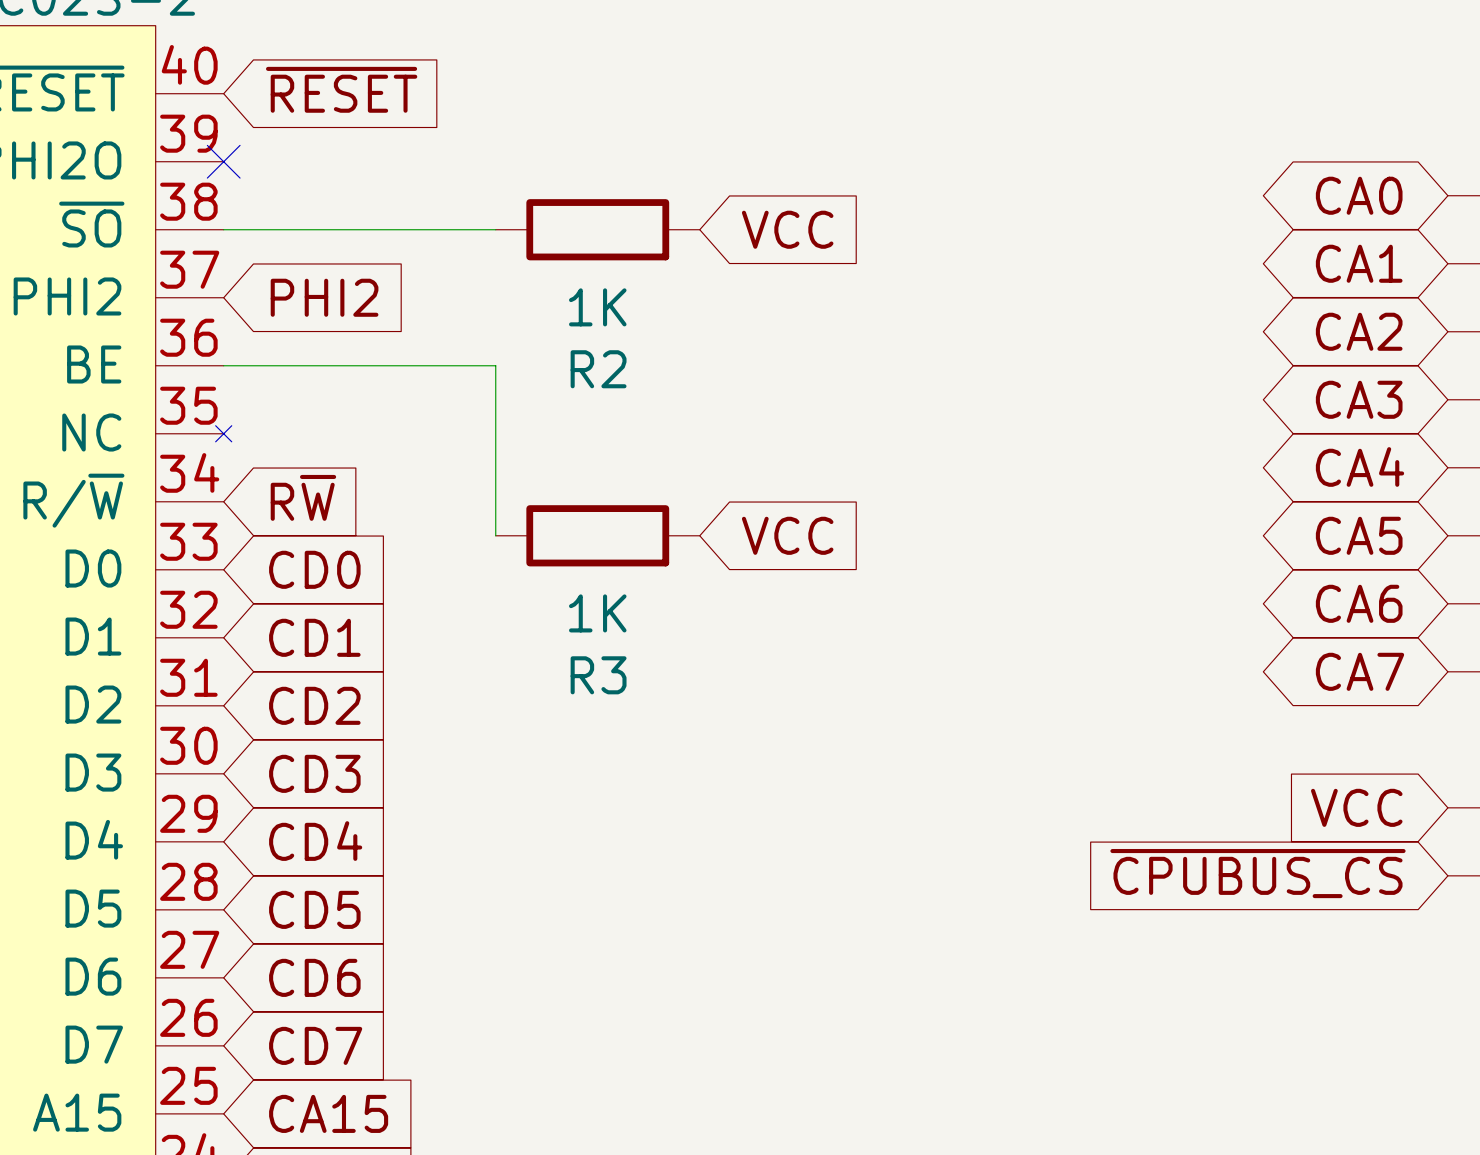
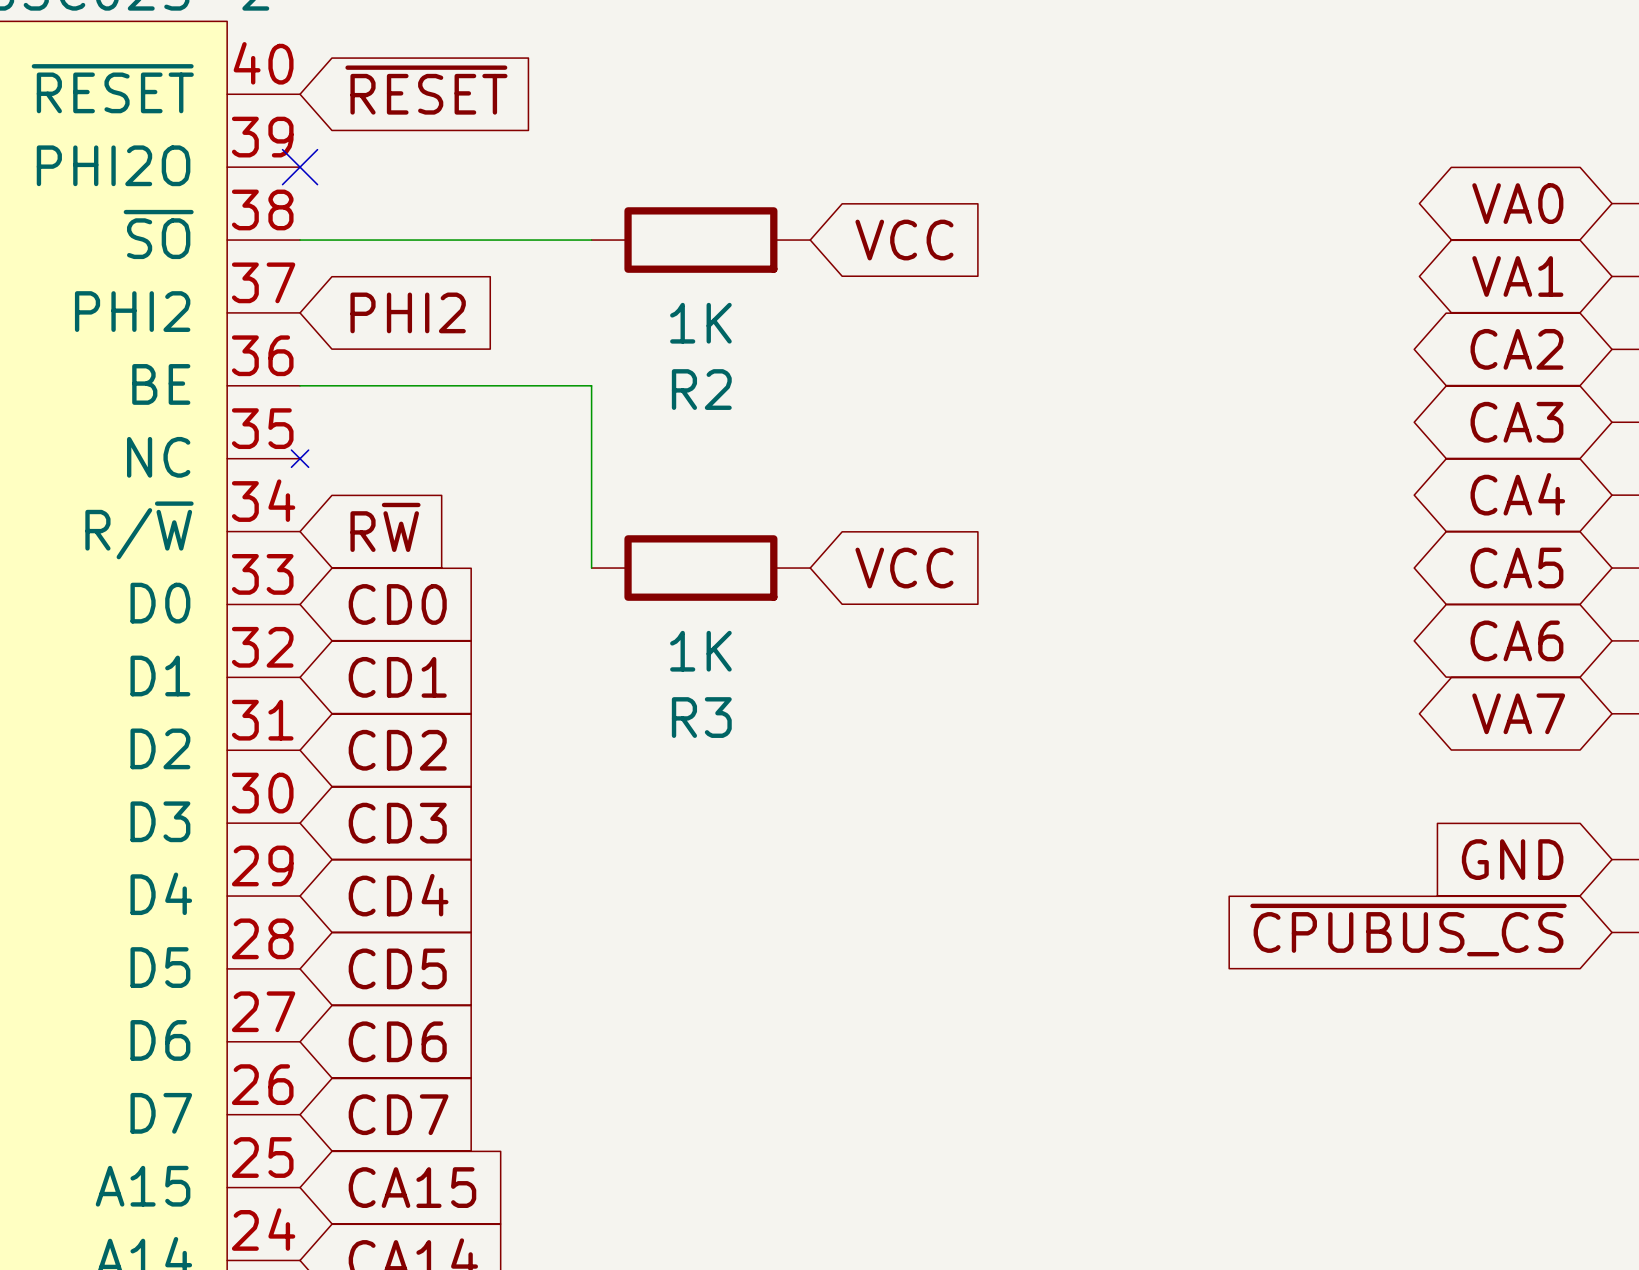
global label: CA0 (1359, 195) -> VA0 (1517, 203)
global label: CA1 (1359, 263) -> VA1 (1517, 276)
global label: CA7 (1360, 671) -> VA7 (1518, 713)
global label: VCC (1356, 807) -> GND (1512, 859)

